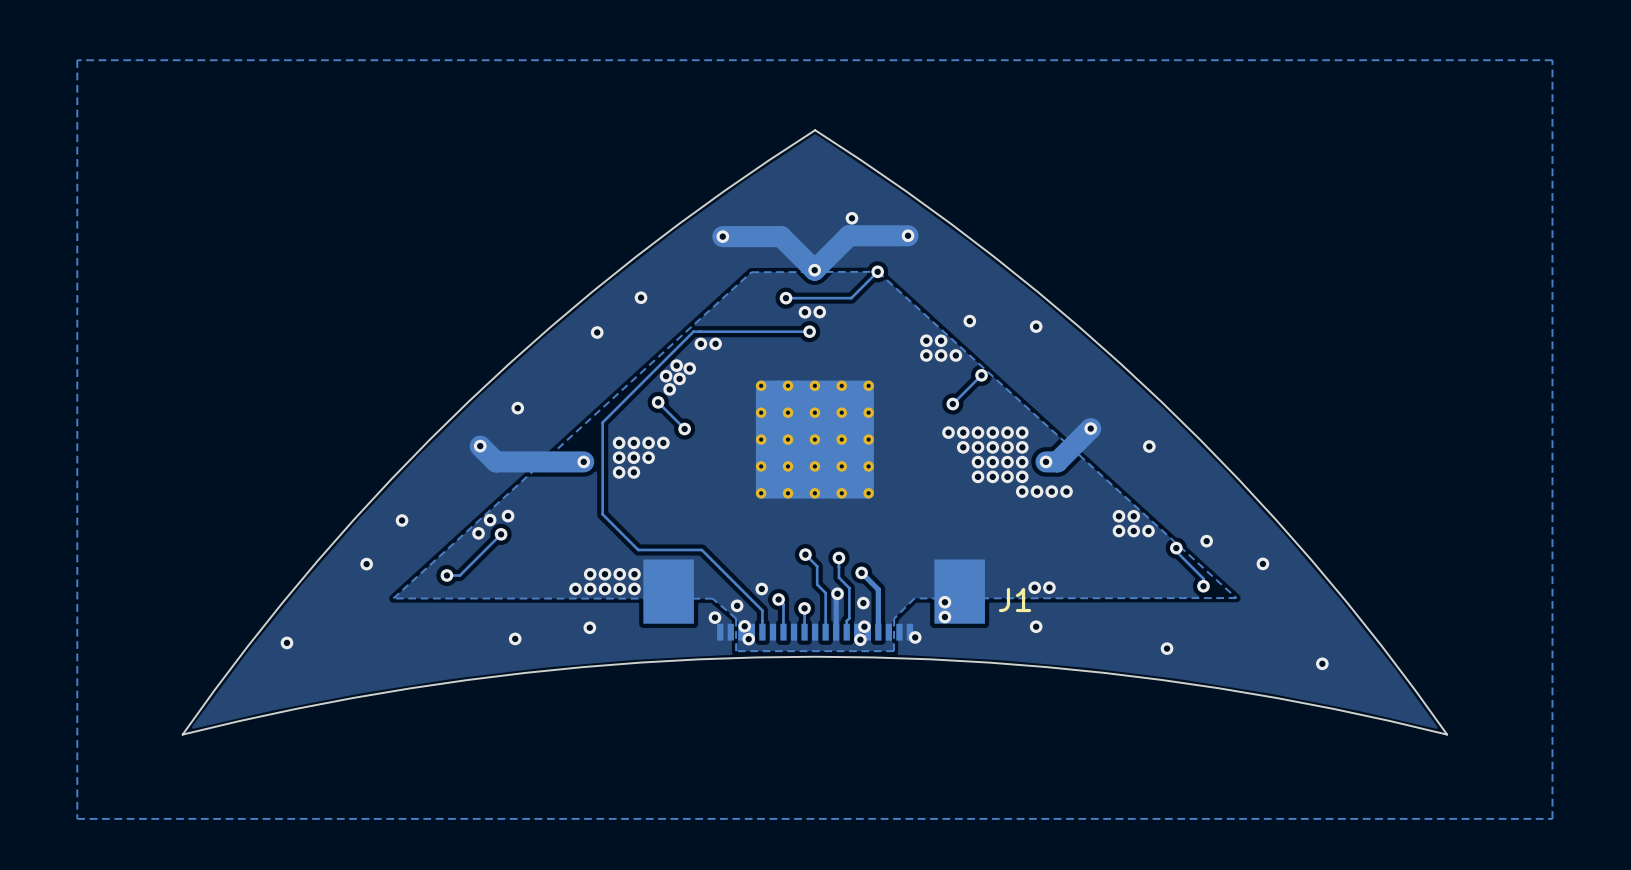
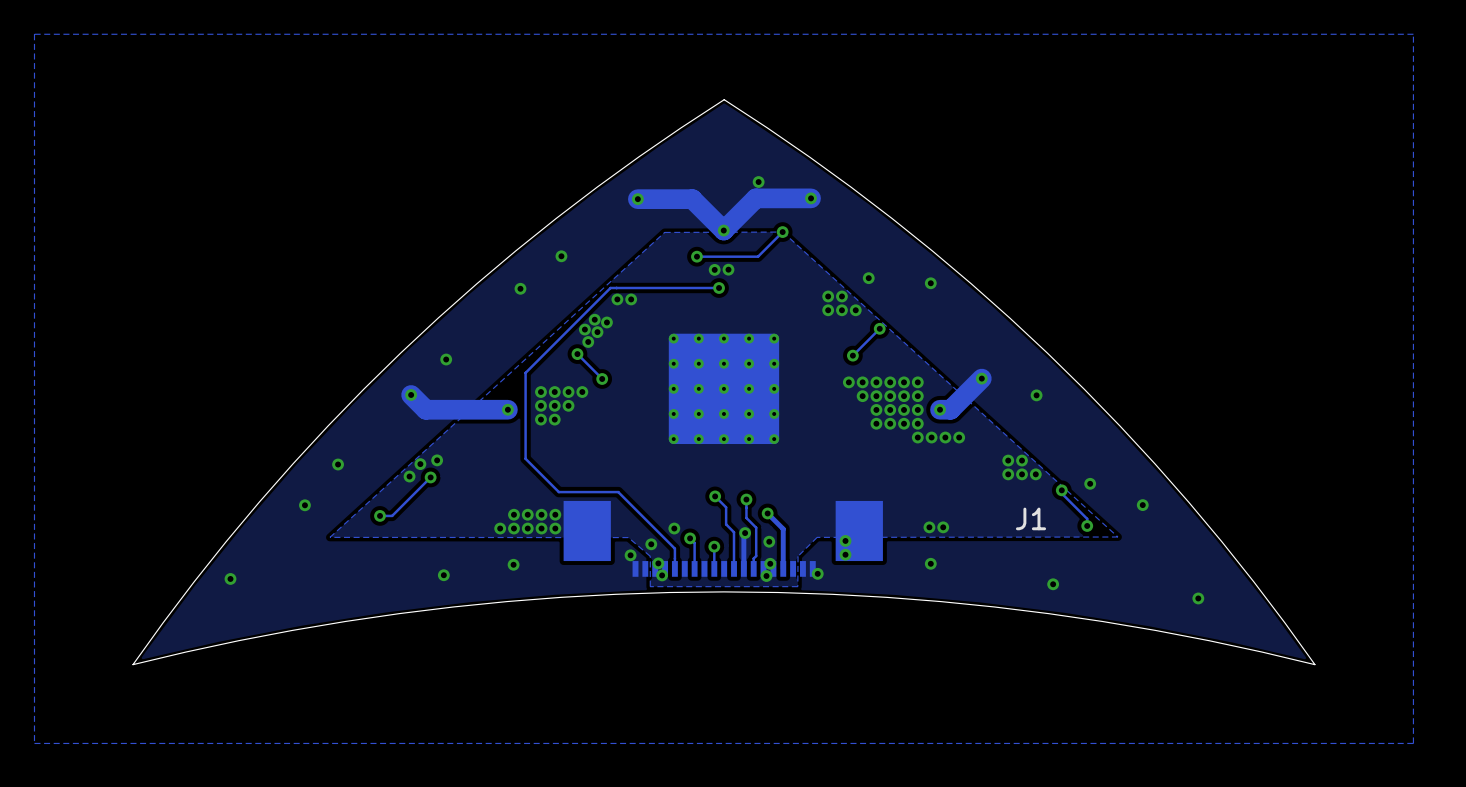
J1 name position: J1 (1015, 599) -> J1 (1030, 518)

